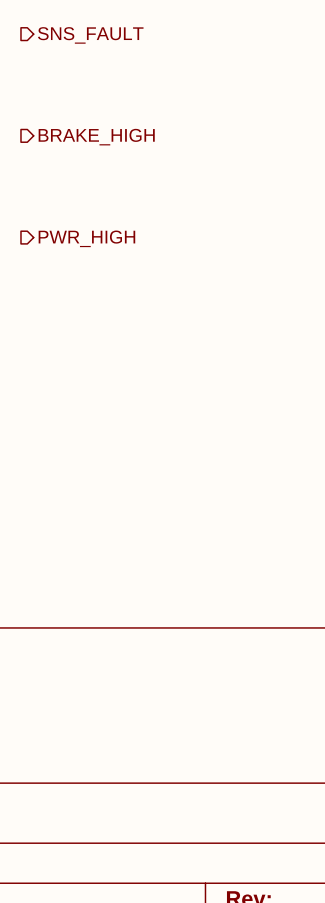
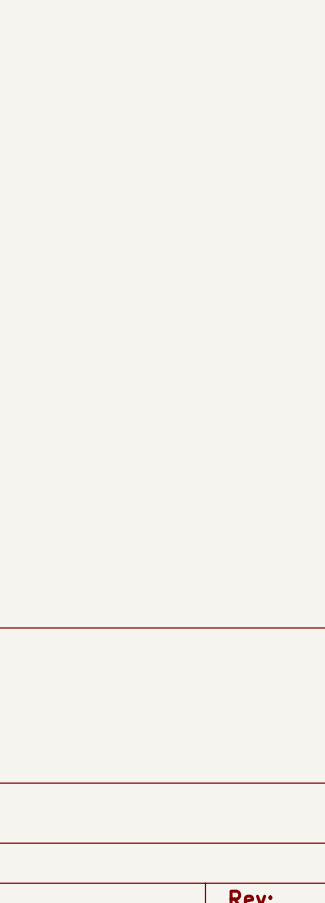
hierarchical label: SNS_FAULT (90, 35) -> none
hierarchical label: BRAKE_HIGH (96, 137) -> none
hierarchical label: PWR_HIGH (86, 238) -> none

